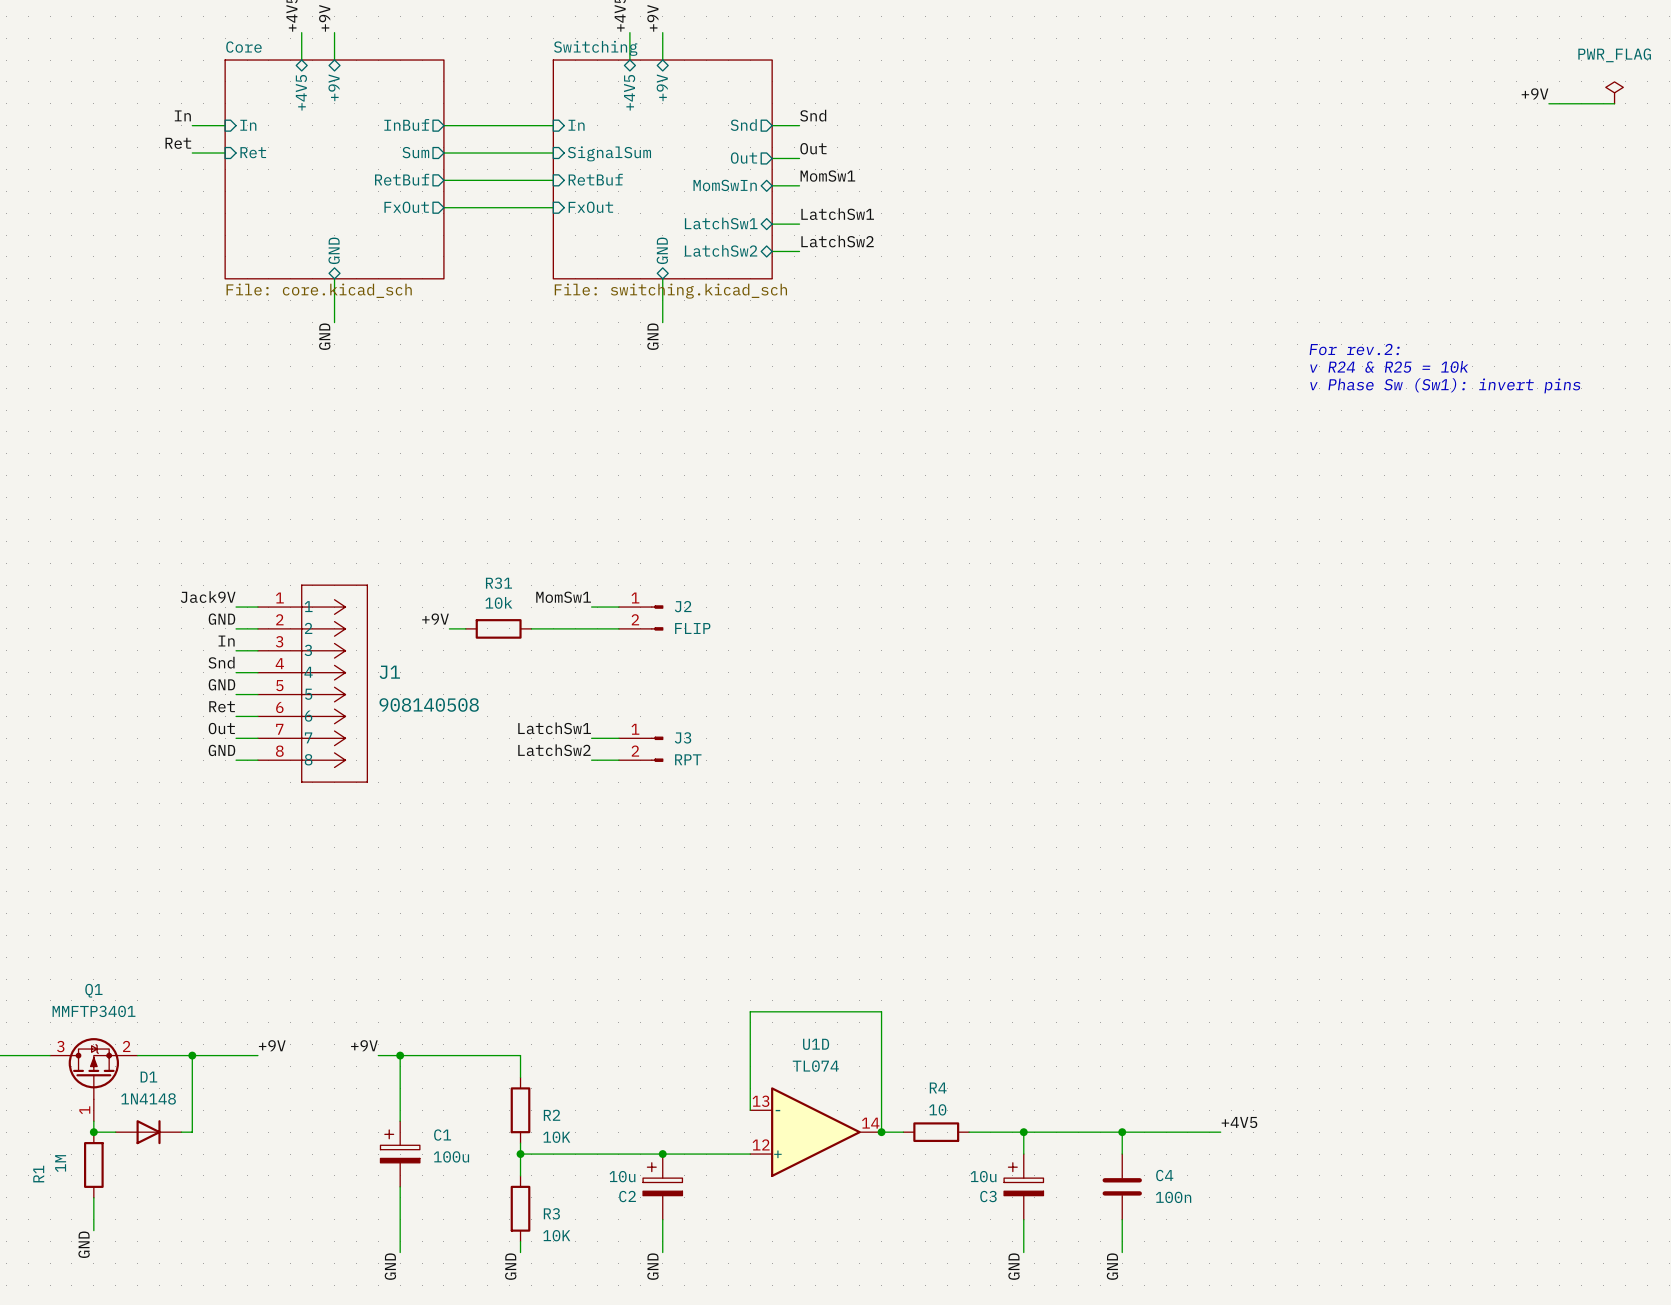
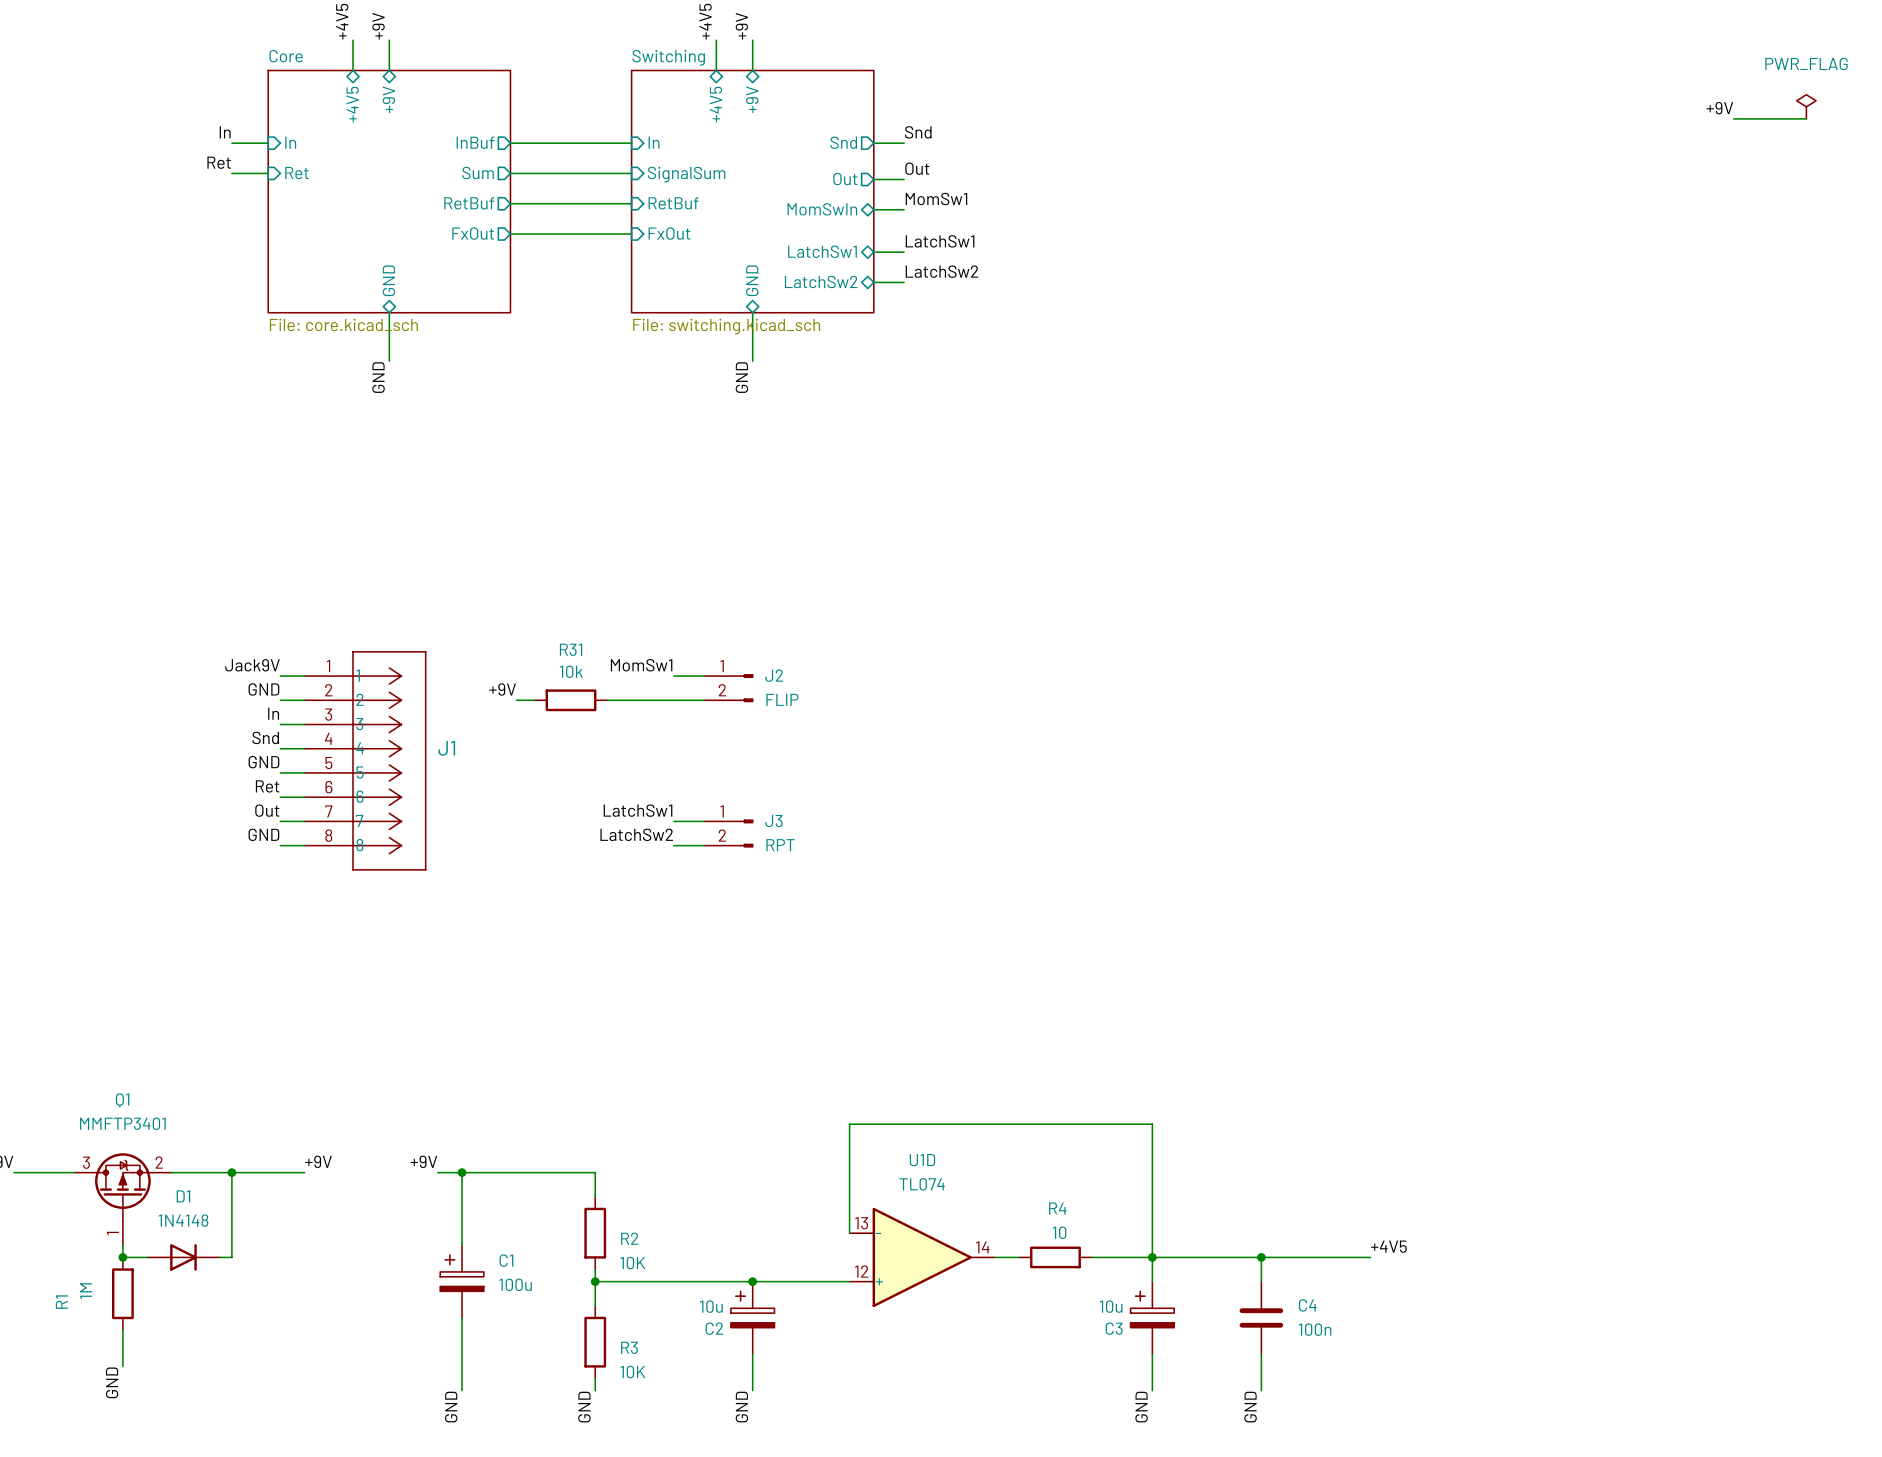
text: For rev.2: (1354, 349) -> none
text: v R24 & R25 = 10k (1389, 366) -> none
text: v Phase Sw (Sw1): invert pins (1445, 385) -> none
J1 value: 908140508 (429, 705) -> none
wire: (881, 1011) (881, 1132) -> (994, 1124) (1152, 1124) (1152, 1257)
junction: (881, 1132) -> none

